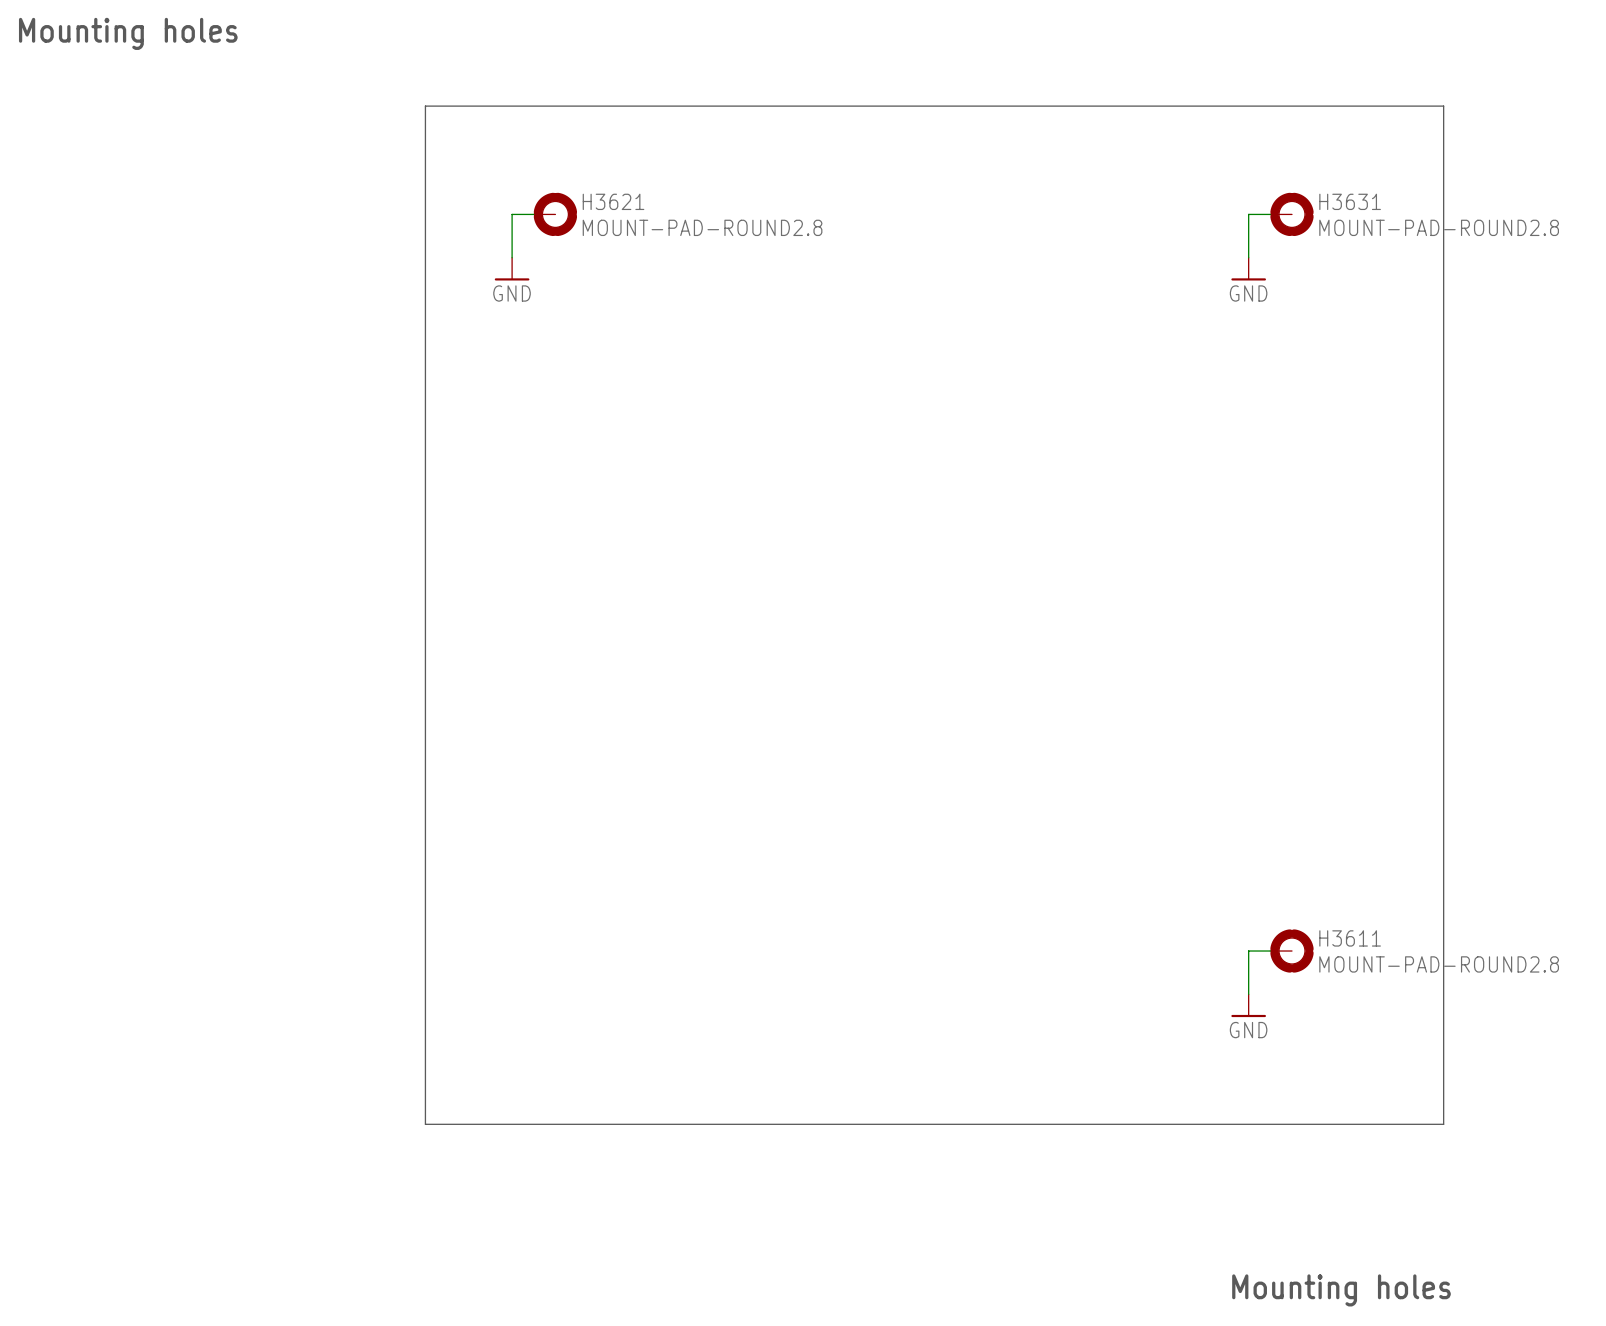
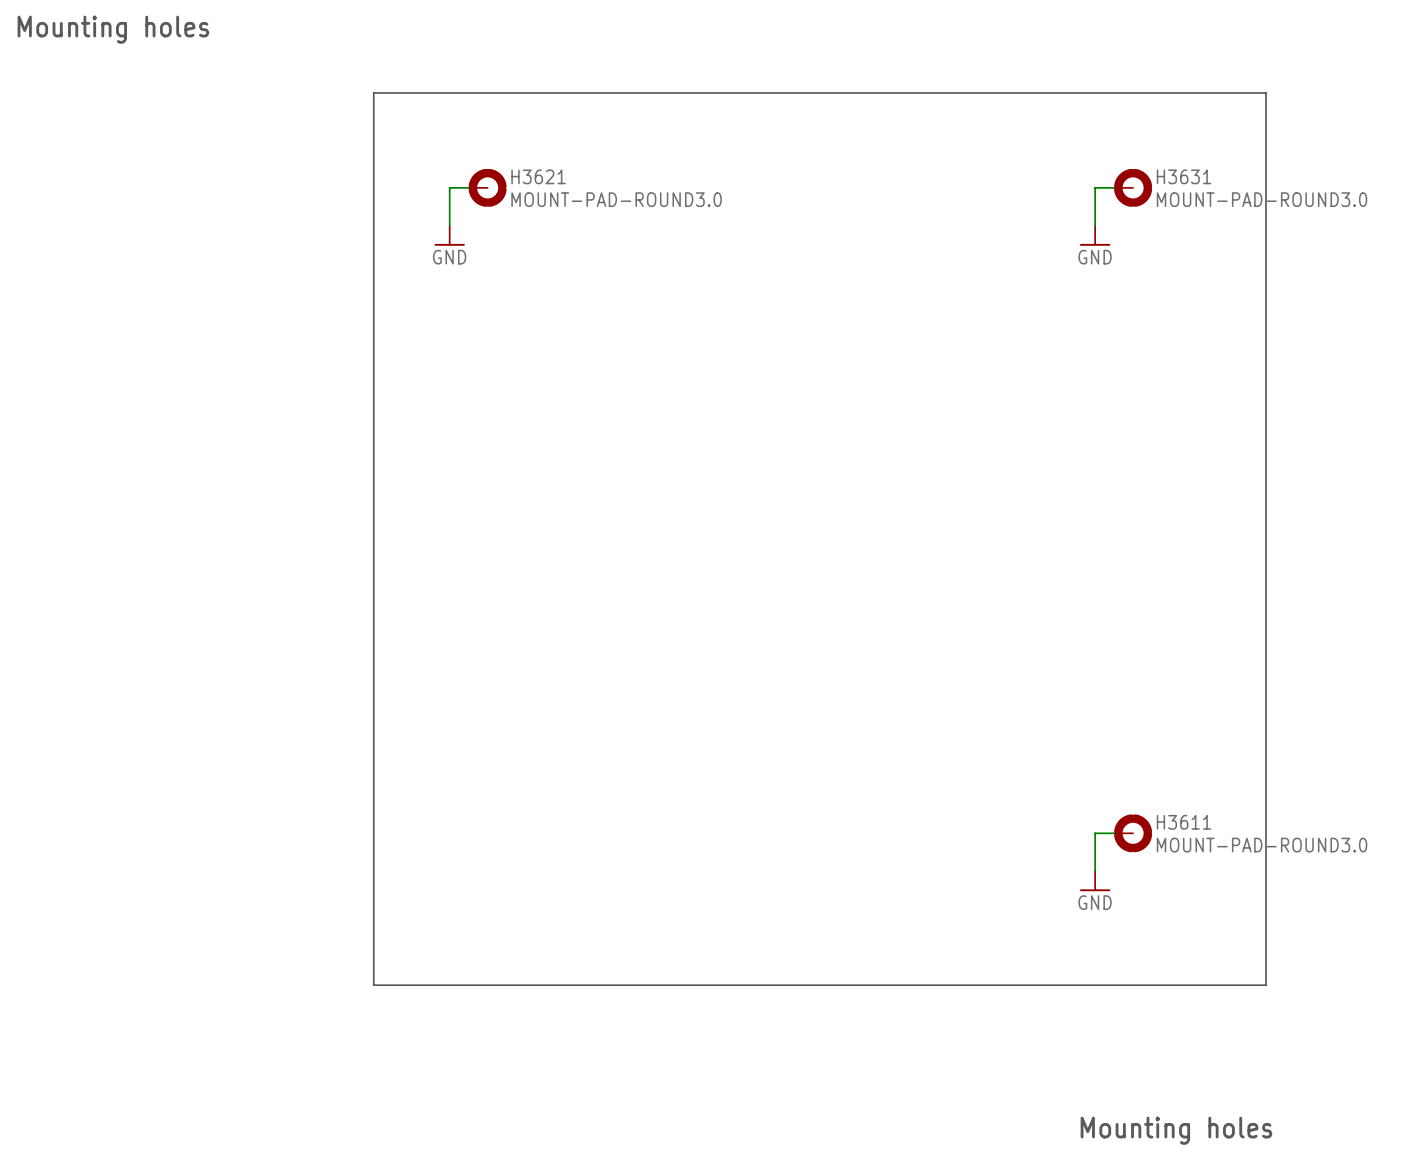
H3621 value: MOUNT-PAD-ROUND2.8 (702, 227) -> MOUNT-PAD-ROUND3.0 (616, 199)
H3631 value: MOUNT-PAD-ROUND2.8 (1439, 227) -> MOUNT-PAD-ROUND3.0 (1262, 199)
H3611 value: MOUNT-PAD-ROUND2.8 (1439, 964) -> MOUNT-PAD-ROUND3.0 (1262, 845)

